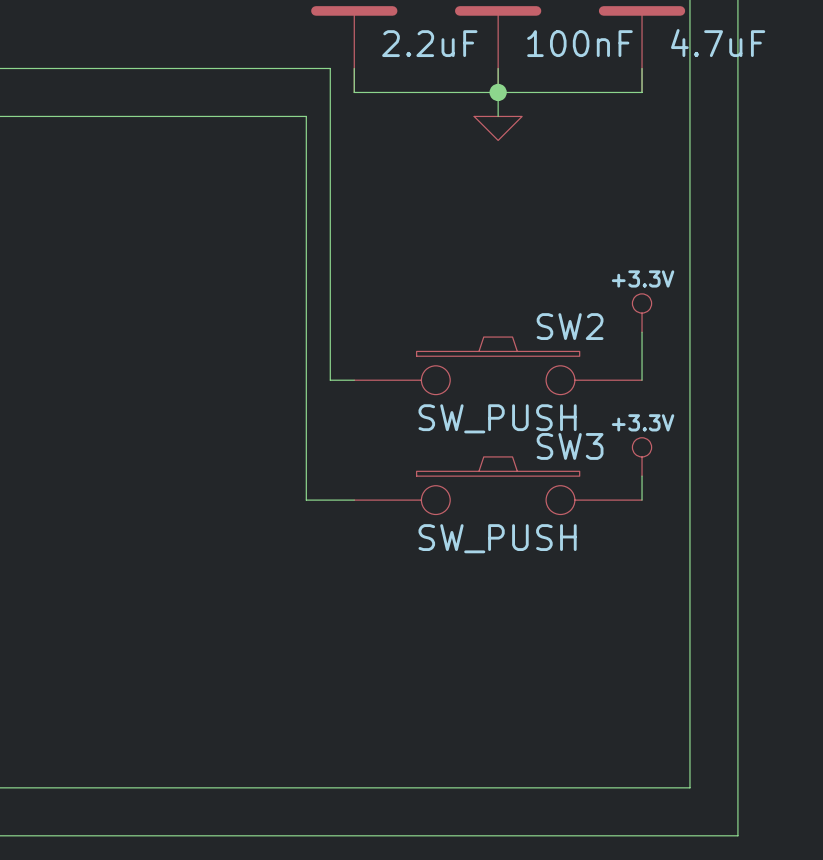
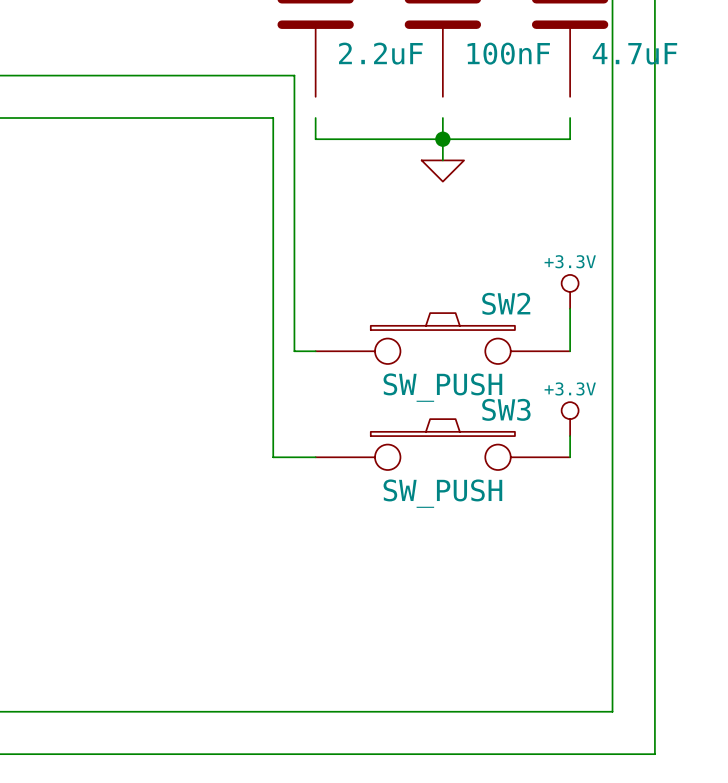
wire: (354, 68) (354, 92) (642, 92) (642, 68) -> (315, 118) (315, 139) (570, 139) (570, 118)
wire: (498, 68) (498, 116) -> (442, 160) (442, 118)
junction position: (498, 92) -> (442, 139)
power symbol position: (498, 128) -> (442, 171)

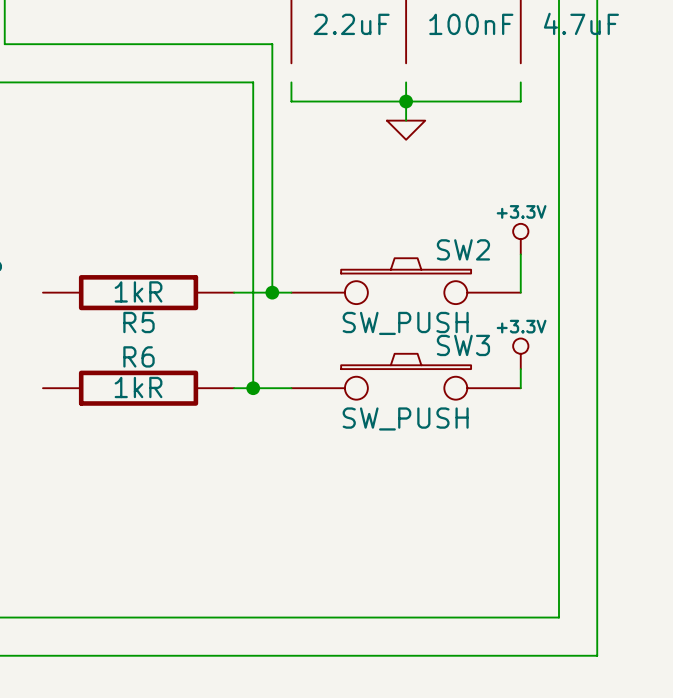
R5: none -> 1kR (138, 292)
wire: none -> (234, 292) (272, 292)
junction: none -> (272, 292)
R6: none -> 1kR (138, 388)
wire: none -> (234, 388) (253, 388)
junction: none -> (253, 388)

